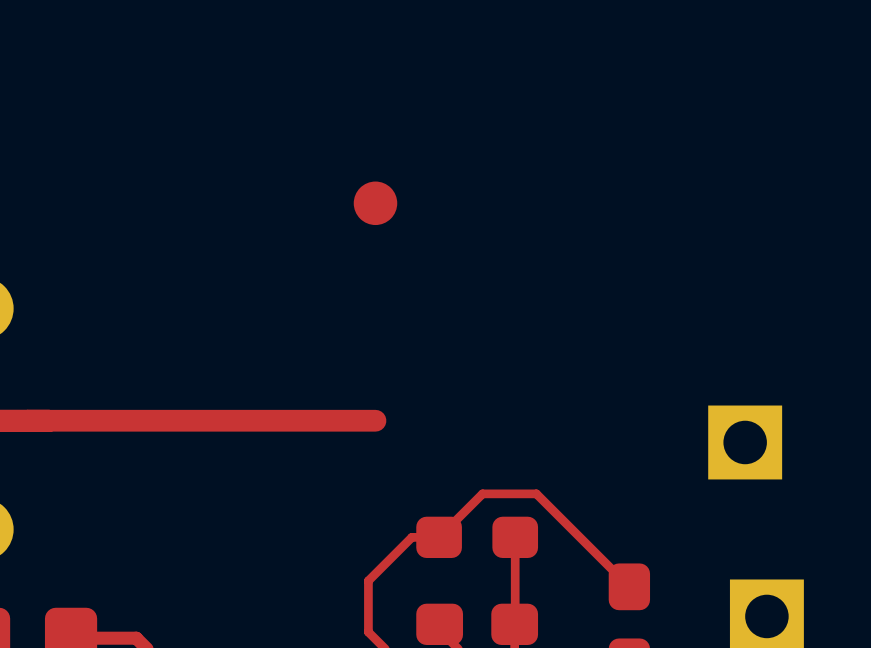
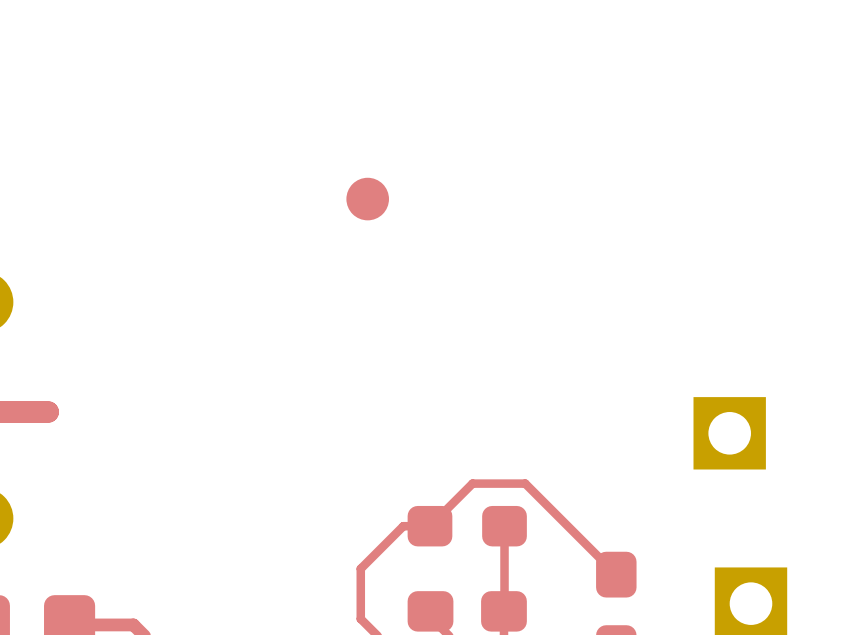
top track: (375, 420) (49, 420) -> none

